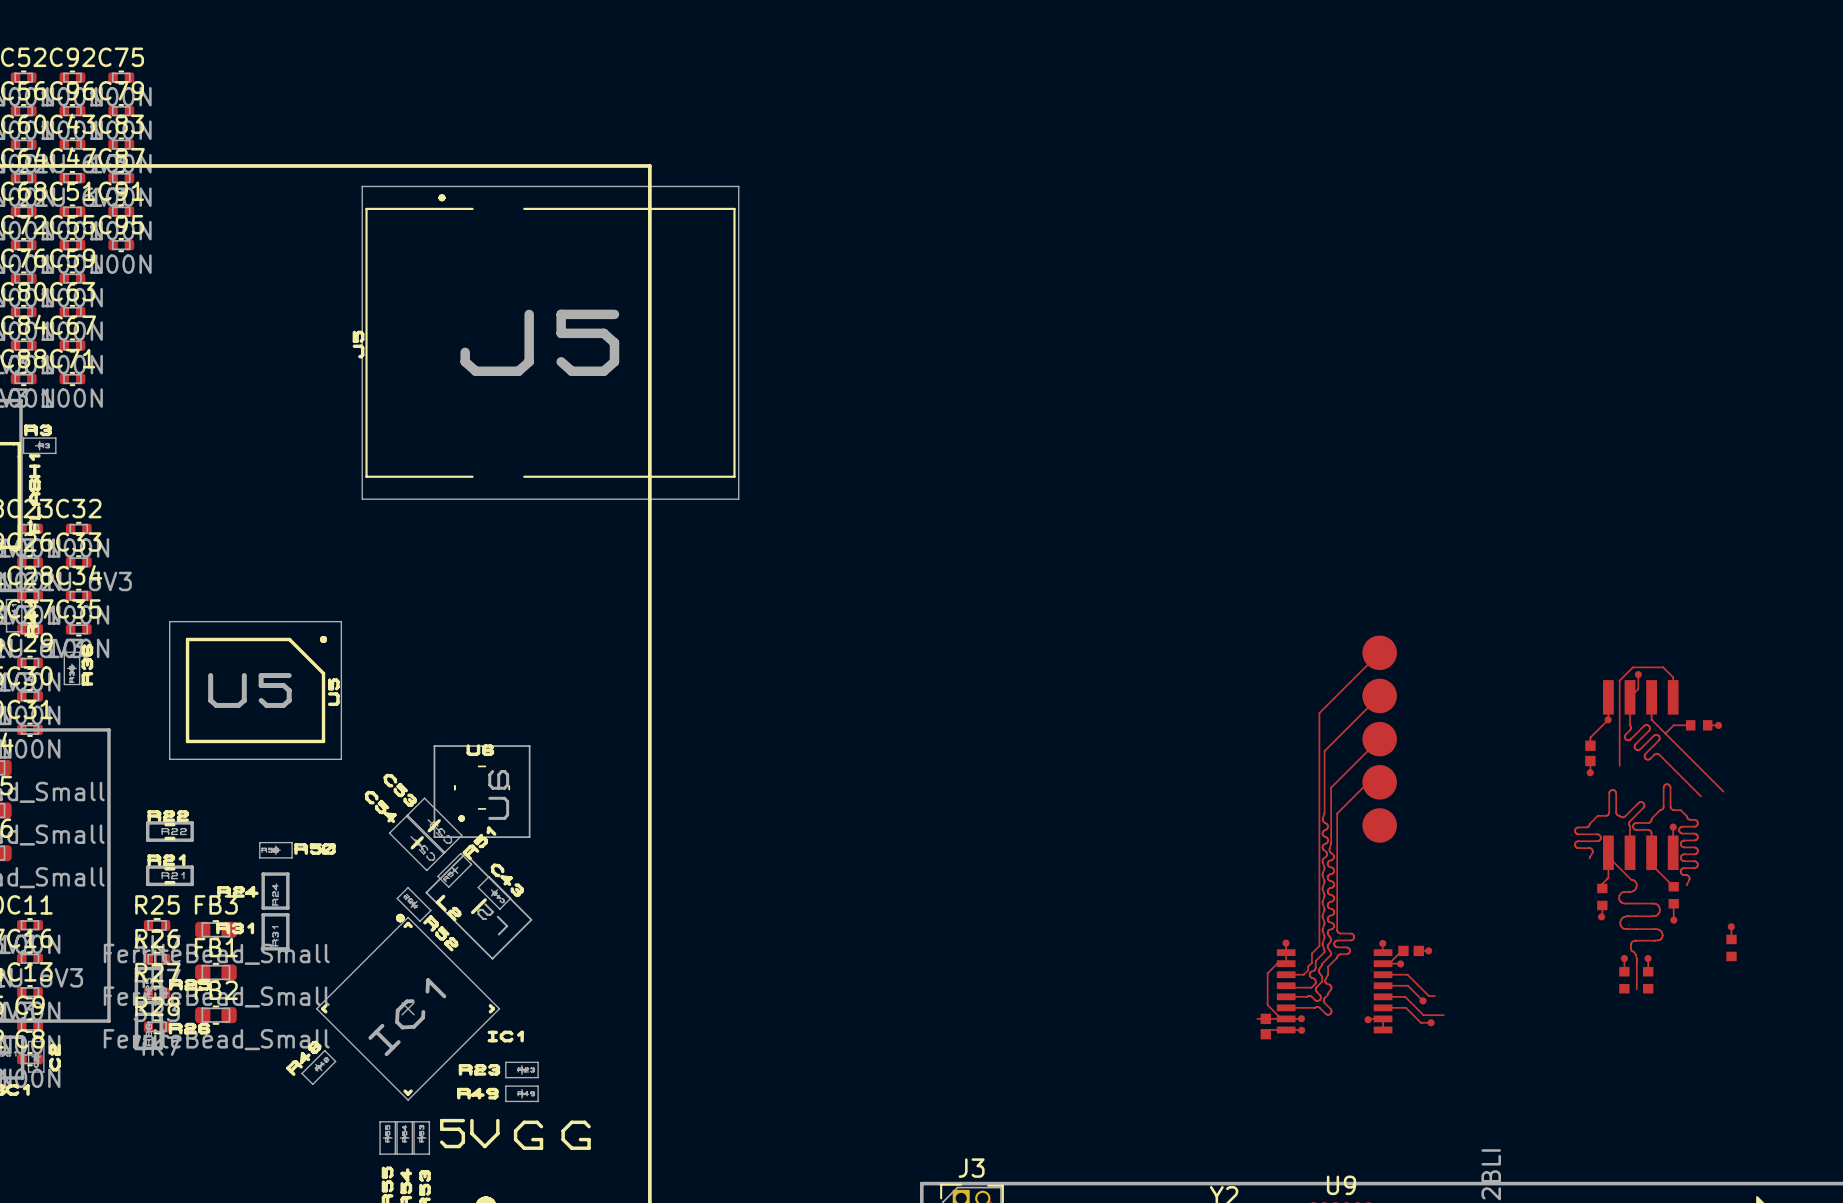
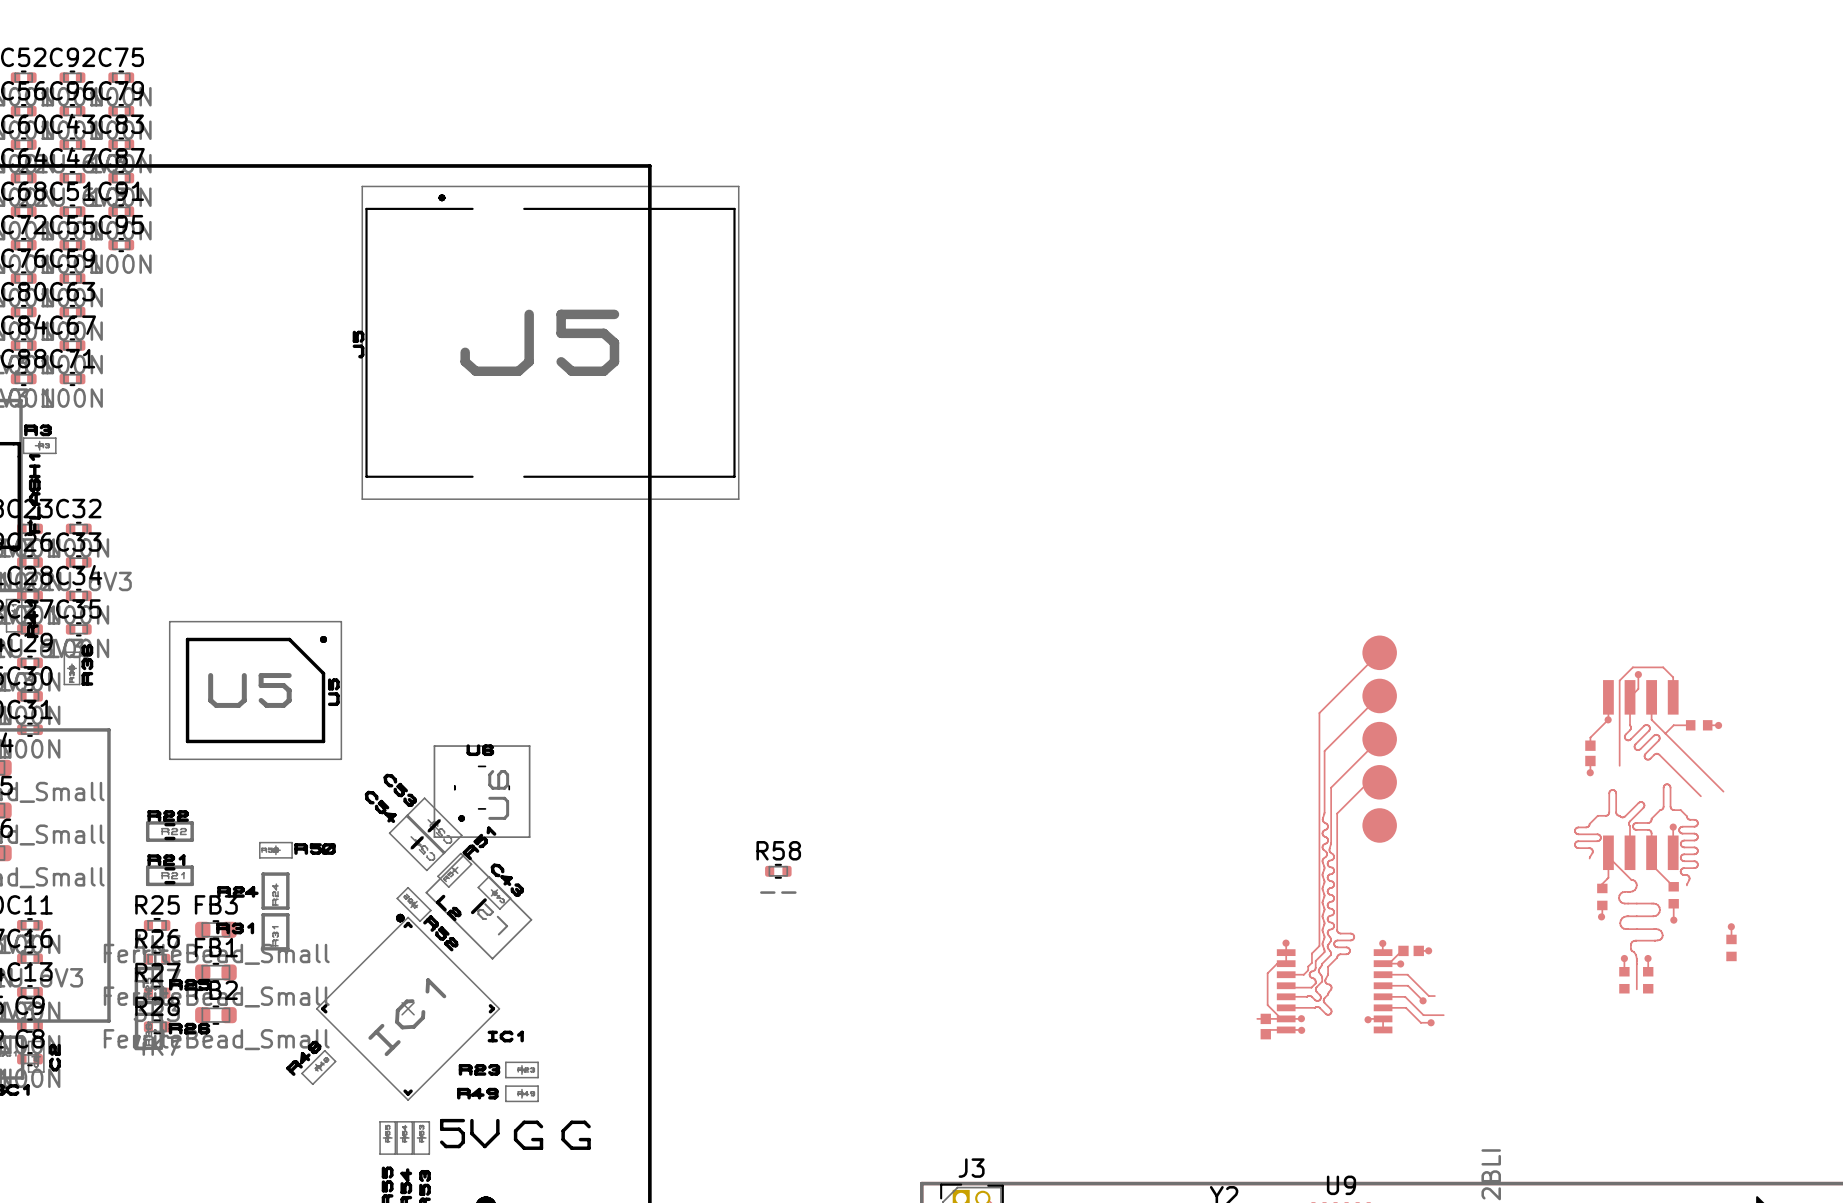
R58: none -> -- (778, 871)

